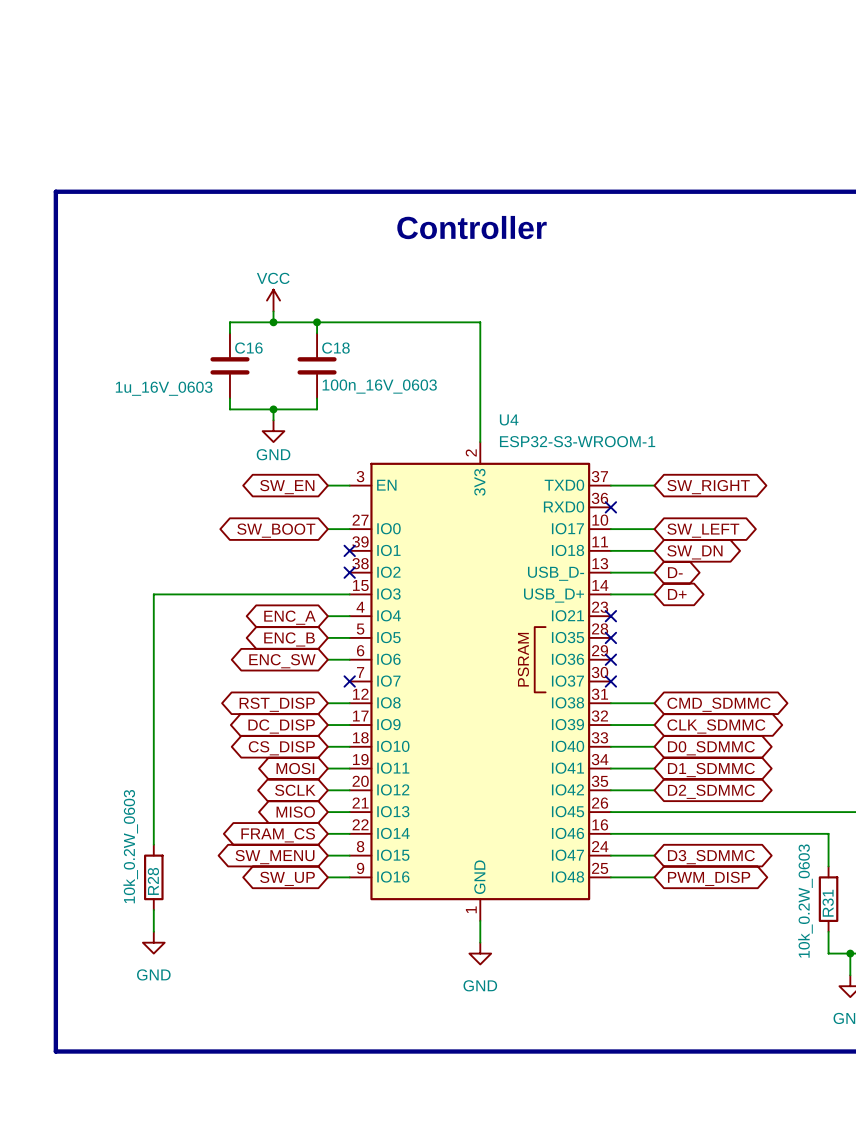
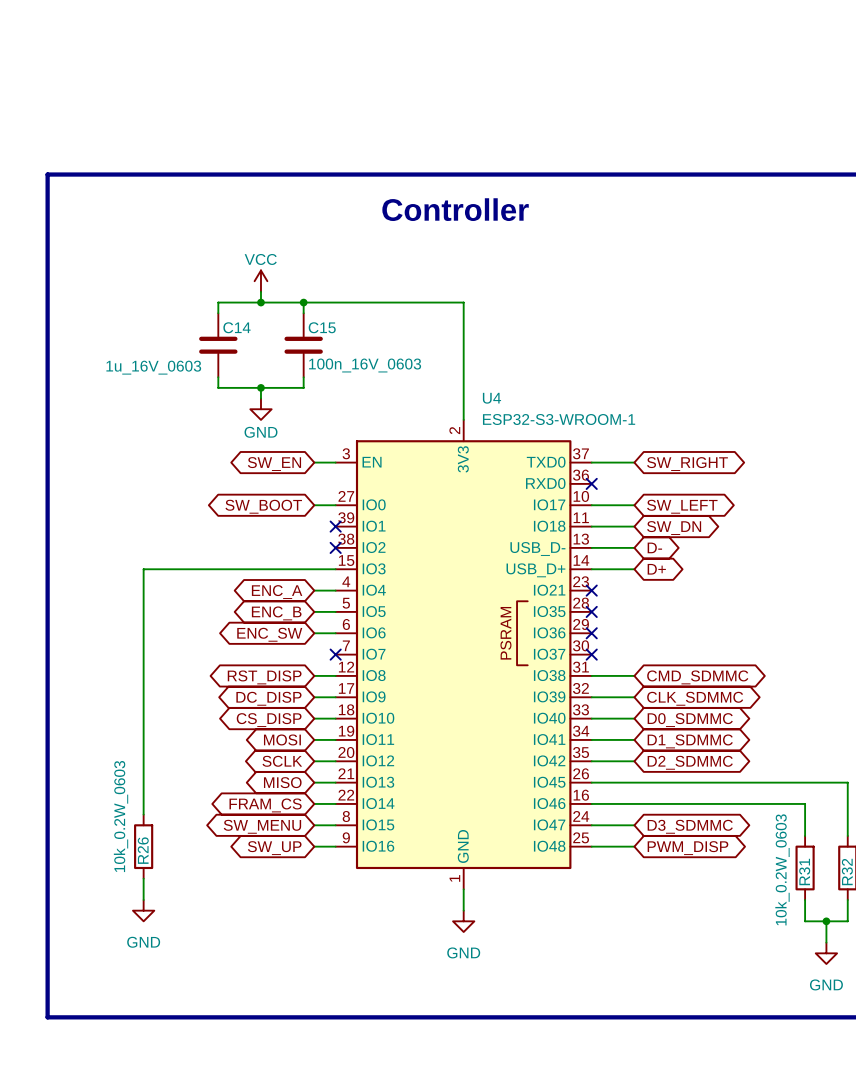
C16 name: C16 (248, 348) -> C14 (236, 327)
C18 name: C18 (335, 348) -> C15 (322, 327)
R28 name: R28 (153, 881) -> R26 (143, 850)

